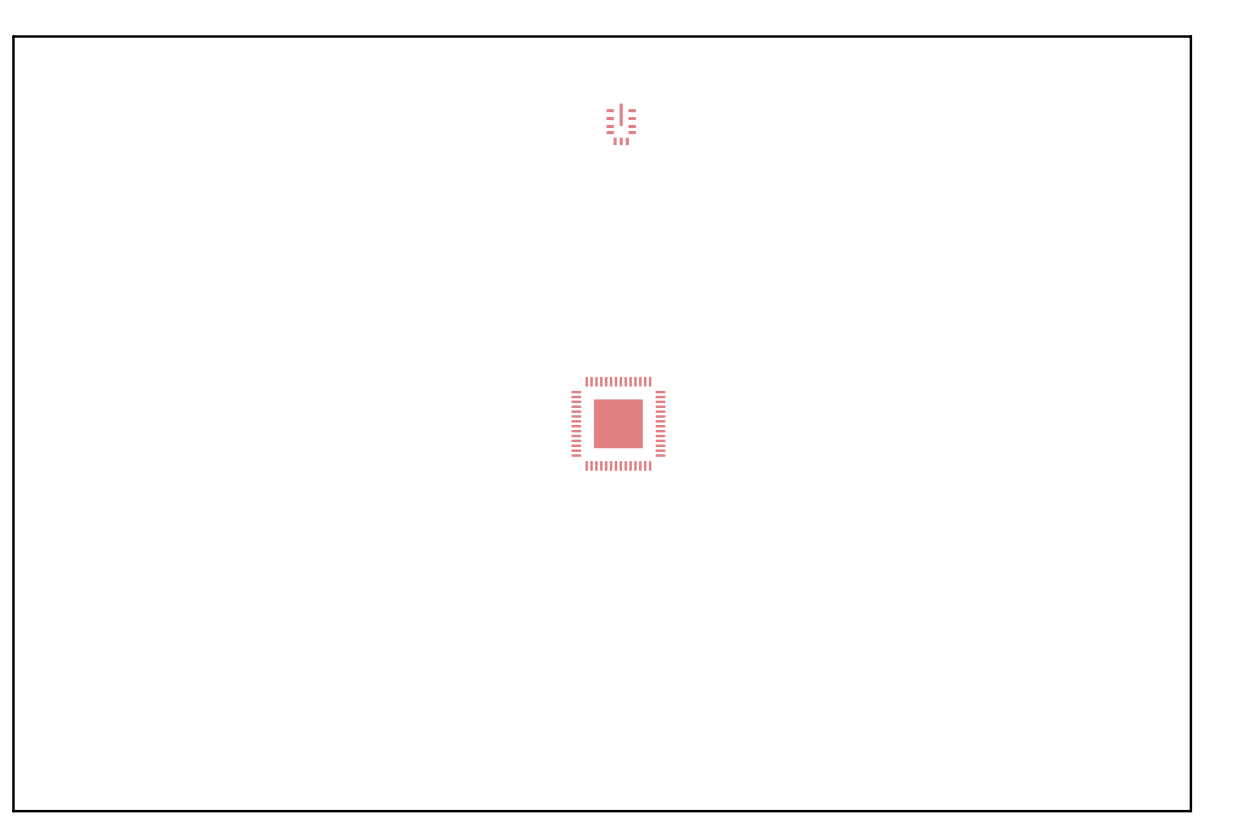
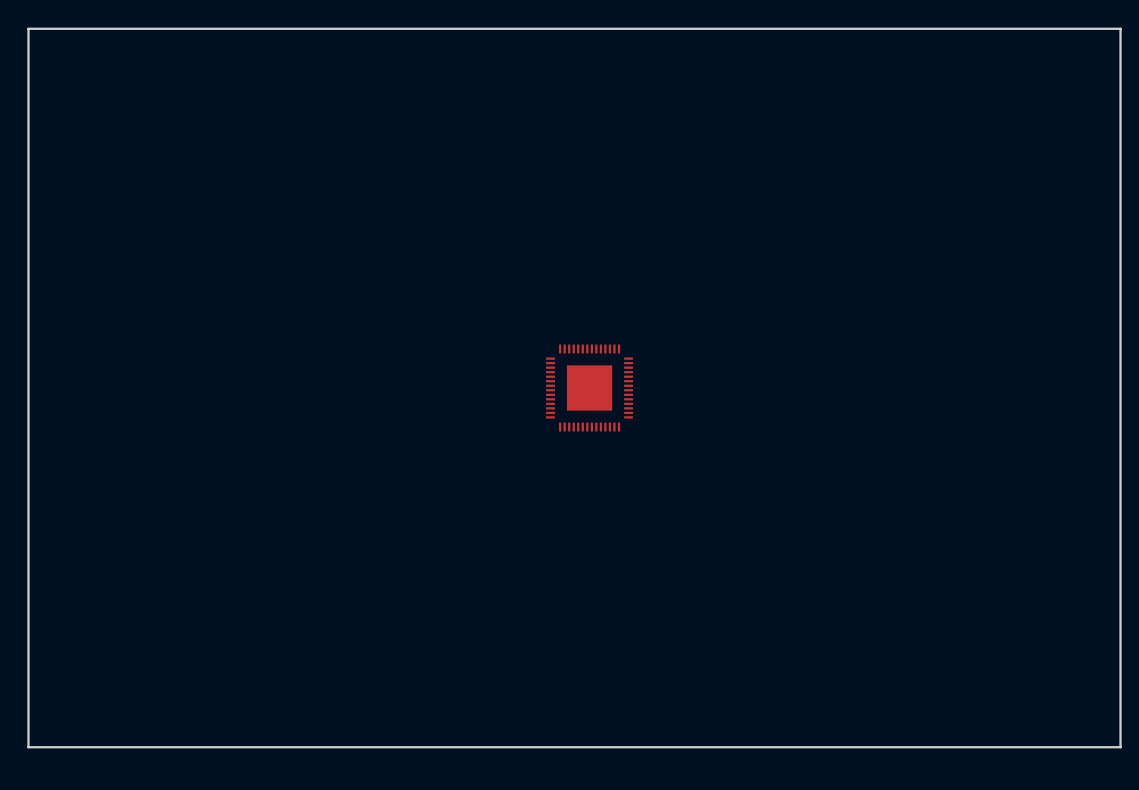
part: (621, 124) -> none

